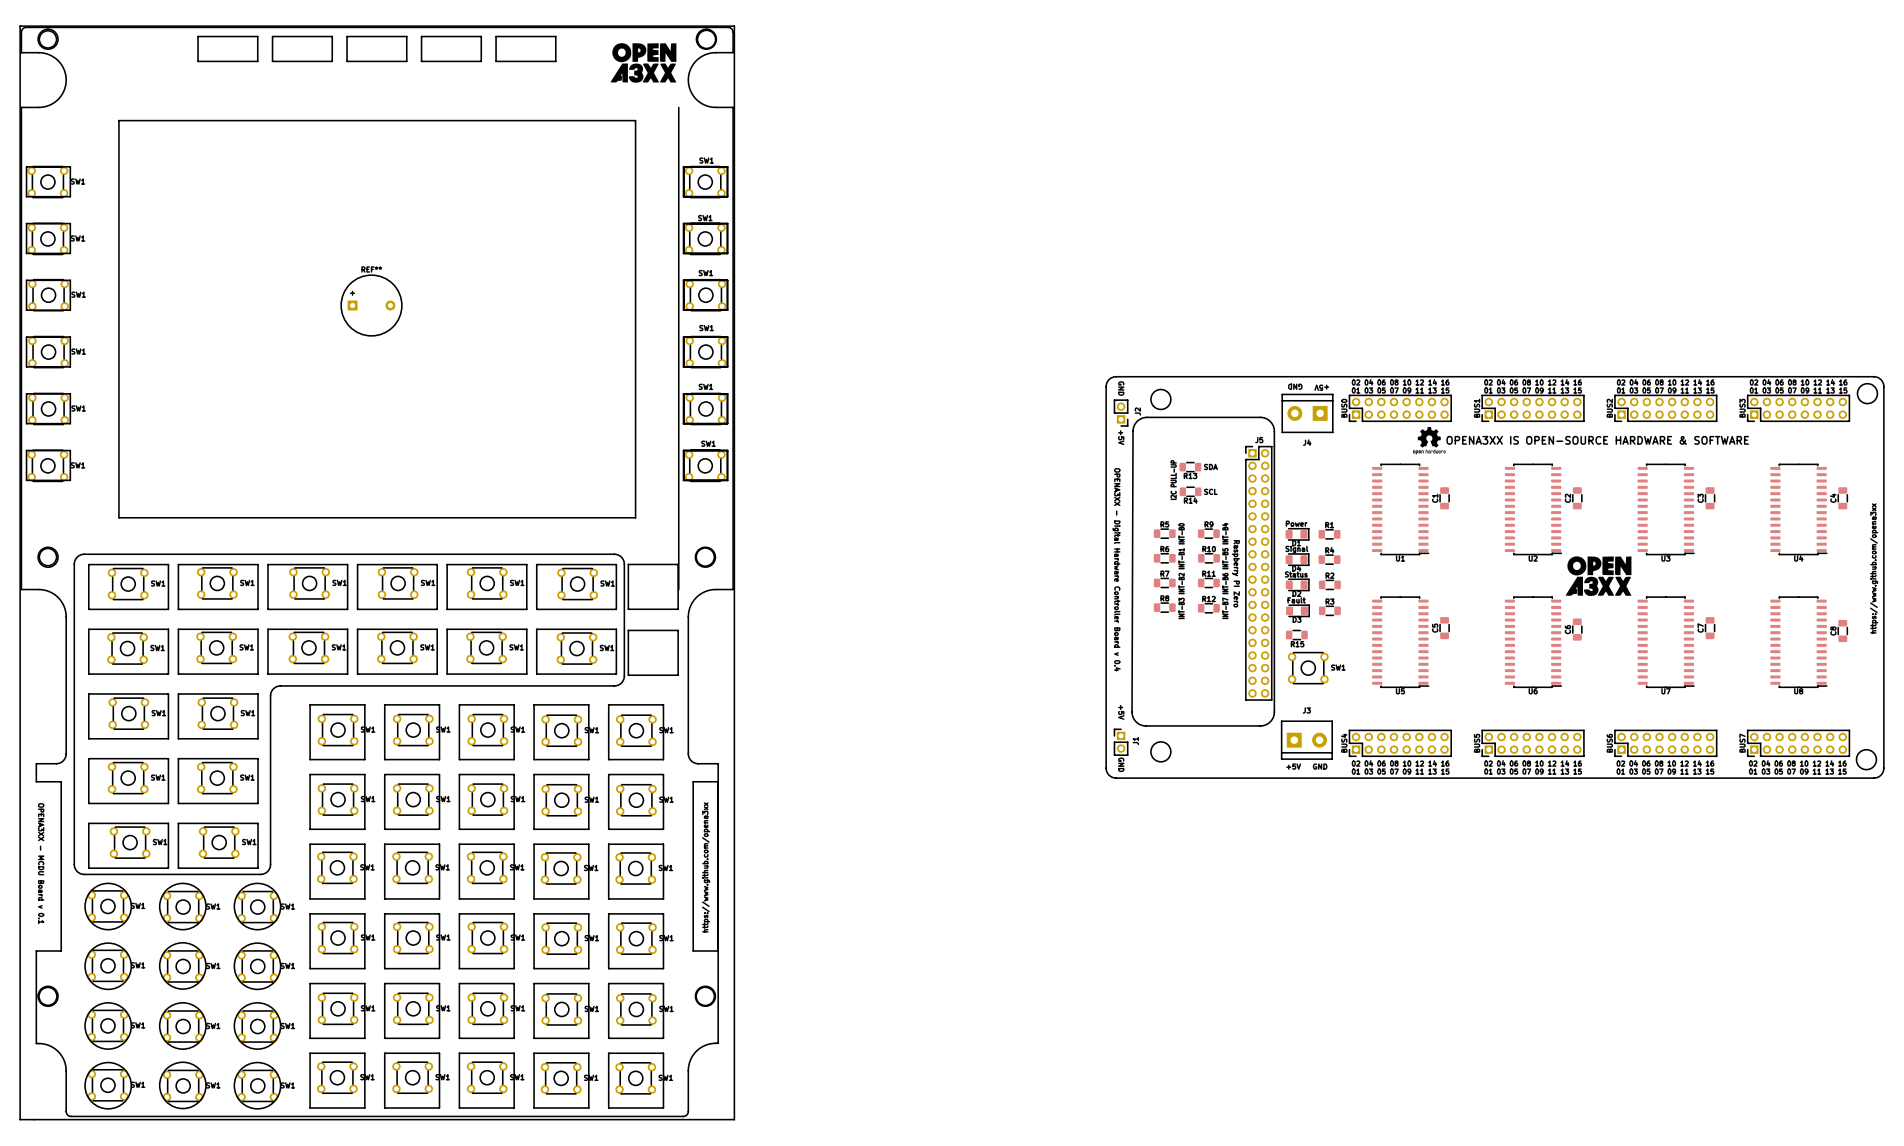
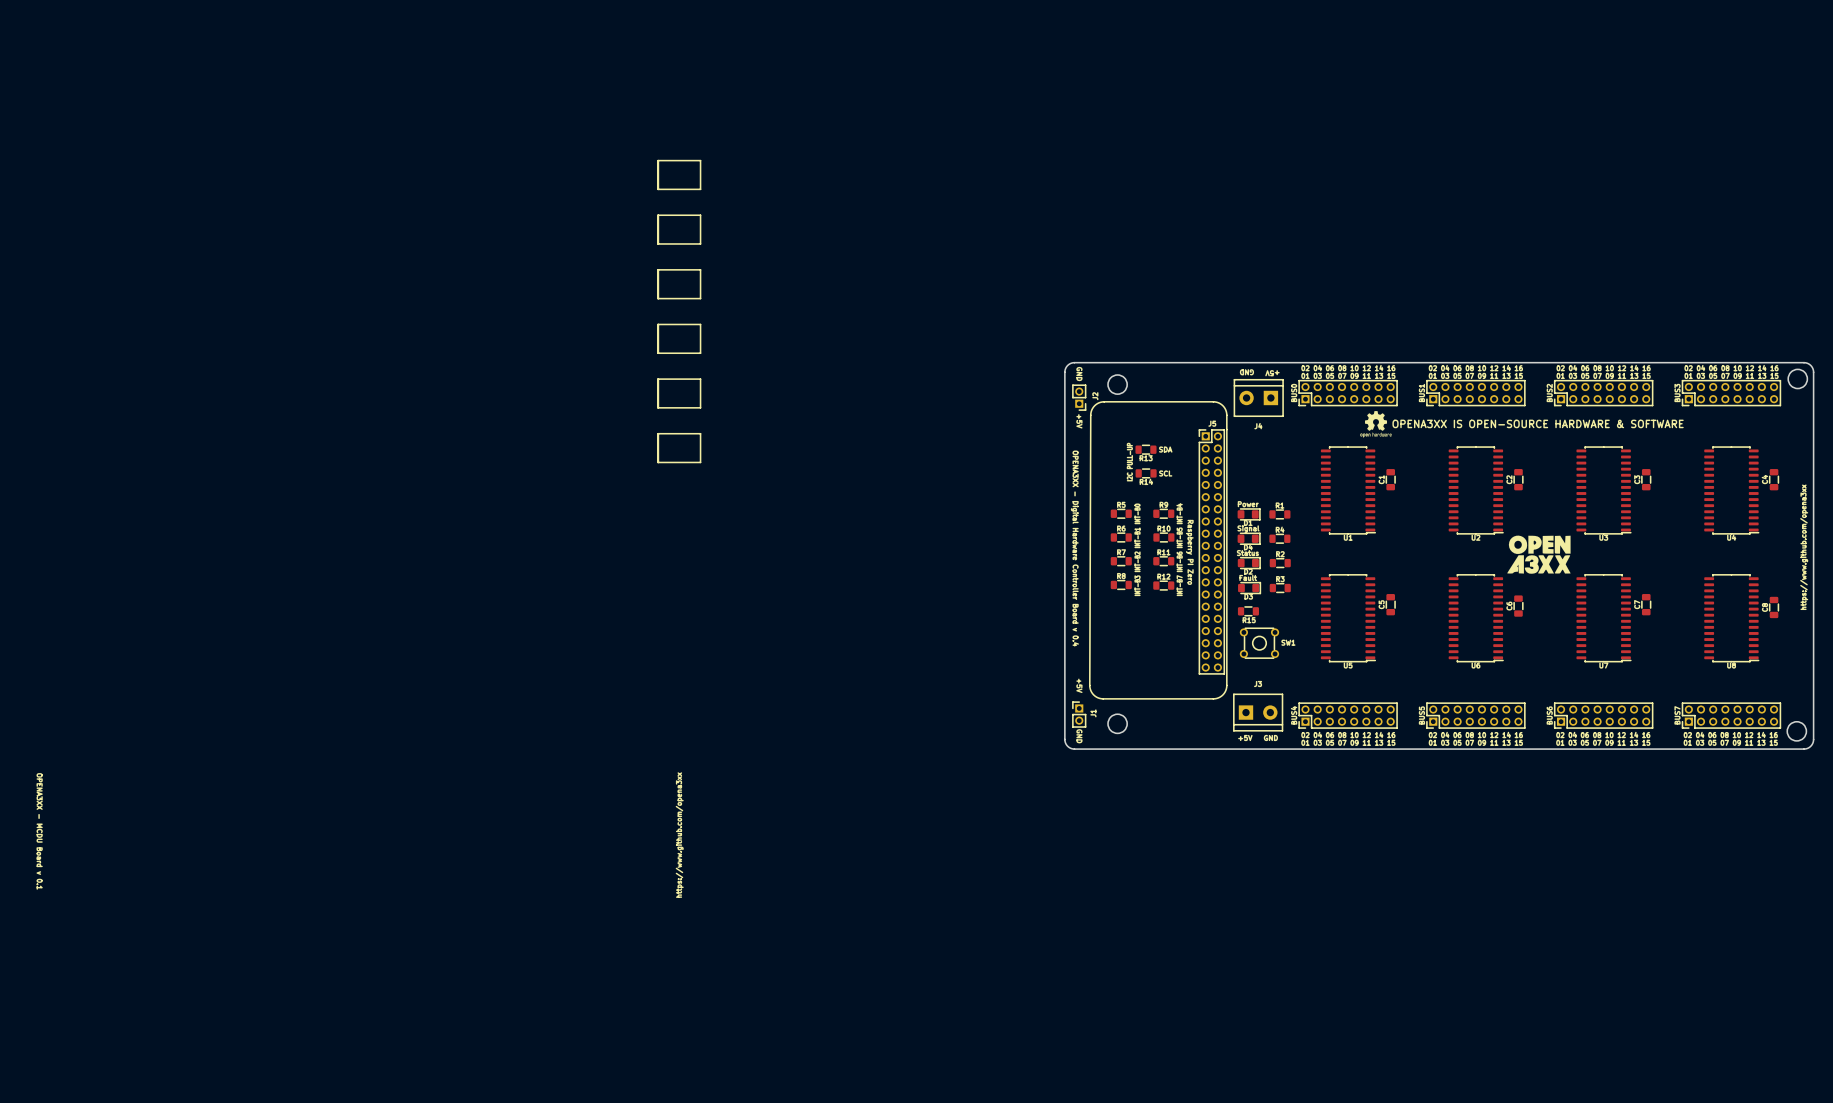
board edge: (20, 26) (20, 1119) (734, 1119) (734, 26) (20, 26) -> none
line: (26, 27) (728, 27) (732, 29) (733, 52) (712, 52) (702, 56) (691, 66) (688, 80) (691, 93) (702, 103) (712, 107) (733, 107) (733, 589) (713, 589) (702, 592) (692, 601) (688, 614) (688, 755) (691, 760) (695, 763) (718, 763) (718, 1043) (700, 1047) (690, 1060) (688, 1070) (688, 1112) (685, 1115) (71, 1116) (66, 1113) (66, 1068) (64, 1060) (54, 1048) (36, 1043) (36, 950) (61, 950) (61, 781) (36, 781) (36, 763) (58, 763) (63, 760) (66, 755) (66, 614) (61, 601) (51, 592) (41, 589) (21, 589) (21, 107) (41, 107) (52, 103) (62, 93) (66, 80) (62, 66) (52, 56) (41, 52) (21, 52) (21, 31) (26, 27) -> none
drawing: [37, 28, 59, 50] -> none
drawing: [695, 28, 717, 50] -> none
round board edge: [39, 30, 57, 49] -> none
round board edge: [697, 30, 716, 49] -> none
line: (198, 36) (257, 36) (257, 61) (198, 61) (198, 36) -> none
line: (272, 36) (332, 36) (332, 61) (272, 61) (272, 36) -> none
line: (347, 36) (406, 36) (406, 61) (347, 61) (347, 36) -> none
line: (421, 36) (481, 36) (481, 61) (421, 61) (421, 36) -> none
line: (496, 36) (555, 36) (555, 61) (496, 61) (496, 36) -> none
drawing: [610, 43, 677, 83] -> none
line: (678, 107) (678, 589) -> none
line: (118, 120) (635, 120) (635, 517) (118, 517) (118, 120) -> none
line: (26, 166) (70, 166) (70, 196) (26, 196) (26, 166) -> none
part: (47, 182) -> none
part: (705, 182) -> none
line: (26, 223) (70, 223) (70, 253) (26, 253) (26, 223) -> none
part: (47, 238) -> none
part: (705, 238) -> none
line: (26, 280) (70, 280) (70, 310) (26, 310) (26, 280) -> none
part: (48, 295) -> none
part: (705, 295) -> none
part: (371, 305) -> none
line: (26, 337) (70, 337) (70, 366) (26, 366) (26, 337) -> none
part: (48, 352) -> none
part: (705, 352) -> none
line: (26, 393) (70, 393) (70, 423) (26, 423) (26, 393) -> none
part: (48, 408) -> none
part: (705, 408) -> none
line: (26, 450) (70, 450) (70, 480) (26, 480) (26, 450) -> none
part: (47, 465) -> none
part: (705, 465) -> none
drawing: [37, 546, 59, 568] -> none
drawing: [694, 546, 716, 568] -> none
round board edge: [696, 547, 715, 567] -> none
round board edge: [39, 548, 57, 566] -> none
line: (84, 554) (616, 554) (622, 558) (624, 564) (624, 678) (620, 683) (614, 685) (276, 686) (271, 690) (270, 695) (270, 864) (267, 871) (260, 874) (81, 874) (76, 870) (74, 864) (74, 564) (77, 557) (84, 554) -> none
line: (88, 564) (168, 564) (168, 609) (88, 609) (88, 564) -> none
line: (178, 564) (258, 564) (258, 609) (178, 609) (178, 564) -> none
line: (267, 564) (347, 564) (347, 609) (267, 609) (267, 564) -> none
line: (357, 564) (357, 609) (437, 609) (437, 564) (357, 564) -> none
line: (447, 564) (526, 564) (526, 609) (447, 609) (447, 564) -> none
line: (536, 564) (616, 564) (616, 609) (536, 609) (536, 564) -> none
line: (628, 564) (678, 564) (678, 609) (628, 609) (628, 564) -> none
part: (217, 583) -> none
part: (309, 583) -> none
part: (398, 583) -> none
part: (487, 583) -> none
part: (128, 584) -> none
part: (577, 584) -> none
line: (88, 629) (88, 674) (168, 674) (168, 629) (88, 629) -> none
line: (178, 629) (178, 674) (258, 674) (258, 629) (178, 629) -> none
line: (267, 629) (347, 629) (347, 674) (267, 674) (267, 629) -> none
line: (357, 629) (357, 674) (437, 674) (437, 629) (357, 629) -> none
line: (447, 629) (447, 674) (526, 674) (526, 629) (447, 629) -> none
line: (536, 629) (616, 629) (616, 674) (536, 674) (536, 629) -> none
line: (628, 630) (628, 675) (678, 675) (678, 630) (628, 630) -> none
part: (216, 647) -> none
part: (308, 647) -> none
part: (397, 647) -> none
part: (486, 647) -> none
part: (127, 648) -> none
part: (576, 648) -> none
line: (88, 693) (88, 738) (168, 738) (168, 693) (88, 693) -> none
line: (178, 693) (178, 738) (258, 738) (258, 693) (178, 693) -> none
line: (310, 704) (310, 759) (364, 759) (364, 704) (310, 704) -> none
line: (384, 704) (384, 759) (439, 759) (439, 704) (384, 704) -> none
line: (459, 704) (459, 759) (514, 759) (514, 704) (459, 704) -> none
line: (534, 704) (534, 759) (588, 759) (588, 704) (534, 704) -> none
line: (608, 704) (608, 759) (663, 759) (663, 704) (608, 704) -> none
part: (128, 713) -> none
part: (217, 713) -> none
part: (338, 730) -> none
part: (413, 730) -> none
part: (487, 730) -> none
part: (561, 730) -> none
part: (636, 730) -> none
line: (88, 758) (88, 803) (168, 803) (168, 758) (88, 758) -> none
line: (178, 758) (178, 803) (258, 803) (258, 758) (178, 758) -> none
line: (310, 774) (364, 774) (364, 829) (310, 829) (310, 774) -> none
line: (384, 774) (439, 774) (439, 829) (384, 829) (384, 774) -> none
line: (459, 774) (514, 774) (514, 829) (459, 829) (459, 774) -> none
line: (534, 774) (588, 774) (588, 829) (534, 829) (534, 774) -> none
line: (608, 774) (663, 774) (663, 829) (608, 829) (608, 774) -> none
part: (128, 778) -> none
part: (217, 778) -> none
line: (693, 781) (718, 781) (718, 950) (693, 950) (693, 781) -> none
part: (338, 799) -> none
part: (413, 799) -> none
part: (487, 799) -> none
part: (561, 800) -> none
part: (636, 800) -> none
line: (88, 823) (88, 868) (168, 868) (168, 823) (88, 823) -> none
line: (178, 823) (178, 868) (258, 868) (258, 823) (178, 823) -> none
part: (130, 842) -> none
part: (219, 842) -> none
line: (310, 844) (364, 844) (364, 898) (310, 898) (310, 844) -> none
line: (384, 844) (439, 844) (439, 898) (384, 898) (384, 844) -> none
line: (459, 844) (514, 844) (514, 898) (459, 898) (459, 844) -> none
line: (534, 844) (588, 844) (588, 898) (534, 898) (534, 844) -> none
line: (608, 844) (663, 844) (663, 898) (608, 898) (608, 844) -> none
part: (337, 867) -> none
part: (412, 867) -> none
part: (487, 867) -> none
part: (561, 868) -> none
part: (635, 868) -> none
drawing: [84, 882, 132, 931] -> none
drawing: [159, 882, 207, 931] -> none
drawing: [233, 882, 282, 931] -> none
part: (107, 906) -> none
part: (183, 907) -> none
part: (257, 907) -> none
line: (310, 913) (364, 913) (364, 968) (310, 968) (310, 913) -> none
line: (384, 913) (439, 913) (439, 968) (384, 968) (384, 913) -> none
line: (459, 913) (514, 913) (514, 968) (459, 968) (459, 913) -> none
line: (534, 913) (588, 913) (588, 968) (534, 968) (534, 913) -> none
line: (608, 913) (663, 913) (663, 968) (608, 968) (608, 913) -> none
part: (338, 938) -> none
part: (413, 938) -> none
part: (487, 938) -> none
part: (561, 938) -> none
part: (636, 938) -> none
drawing: [84, 942, 132, 990] -> none
drawing: [159, 942, 207, 990] -> none
drawing: [233, 942, 282, 990] -> none
part: (107, 965) -> none
part: (183, 966) -> none
part: (257, 966) -> none
line: (310, 983) (310, 1038) (364, 1038) (364, 983) (310, 983) -> none
line: (384, 983) (384, 1038) (439, 1038) (439, 983) (384, 983) -> none
line: (459, 983) (459, 1038) (514, 1038) (514, 983) (459, 983) -> none
line: (534, 983) (534, 1038) (588, 1038) (588, 983) (534, 983) -> none
line: (608, 983) (608, 1038) (663, 1038) (663, 983) (608, 983) -> none
drawing: [37, 985, 59, 1007] -> none
drawing: [694, 985, 716, 1007] -> none
round board edge: [38, 987, 58, 1006] -> none
round board edge: [696, 987, 715, 1006] -> none
drawing: [84, 1002, 132, 1050] -> none
drawing: [159, 1002, 207, 1050] -> none
drawing: [233, 1002, 282, 1050] -> none
part: (338, 1008) -> none
part: (413, 1008) -> none
part: (487, 1008) -> none
part: (561, 1009) -> none
part: (636, 1009) -> none
part: (107, 1025) -> none
part: (183, 1026) -> none
part: (257, 1026) -> none
line: (310, 1053) (310, 1107) (364, 1107) (364, 1053) (310, 1053) -> none
line: (384, 1053) (384, 1107) (439, 1107) (439, 1053) (384, 1053) -> none
line: (459, 1053) (459, 1107) (514, 1107) (514, 1053) (459, 1053) -> none
line: (534, 1053) (534, 1107) (588, 1107) (588, 1053) (534, 1053) -> none
line: (608, 1053) (608, 1107) (663, 1107) (663, 1053) (608, 1053) -> none
drawing: [159, 1061, 207, 1110] -> none
drawing: [84, 1062, 132, 1110] -> none
drawing: [233, 1062, 282, 1110] -> none
part: (337, 1077) -> none
part: (412, 1077) -> none
part: (487, 1077) -> none
part: (561, 1078) -> none
part: (635, 1078) -> none
part: (107, 1085) -> none
part: (183, 1085) -> none
part: (257, 1085) -> none

